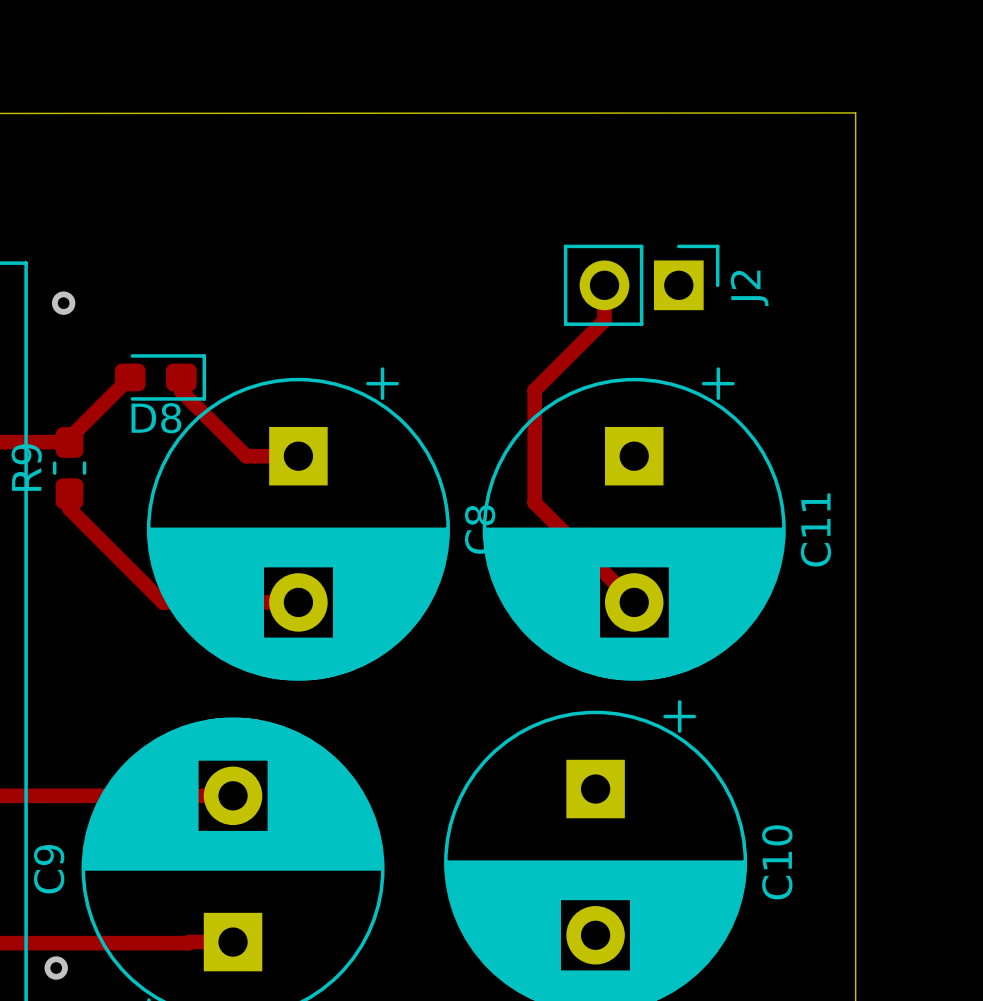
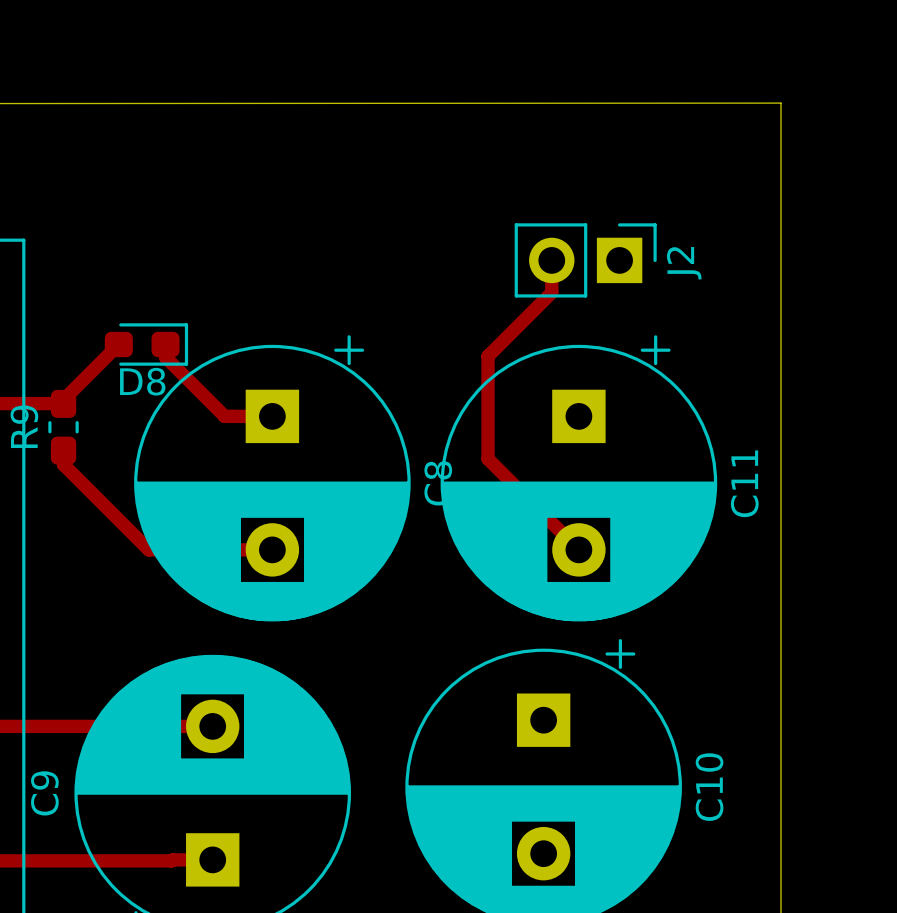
via: (63, 303) -> none
via: (56, 968) -> none

